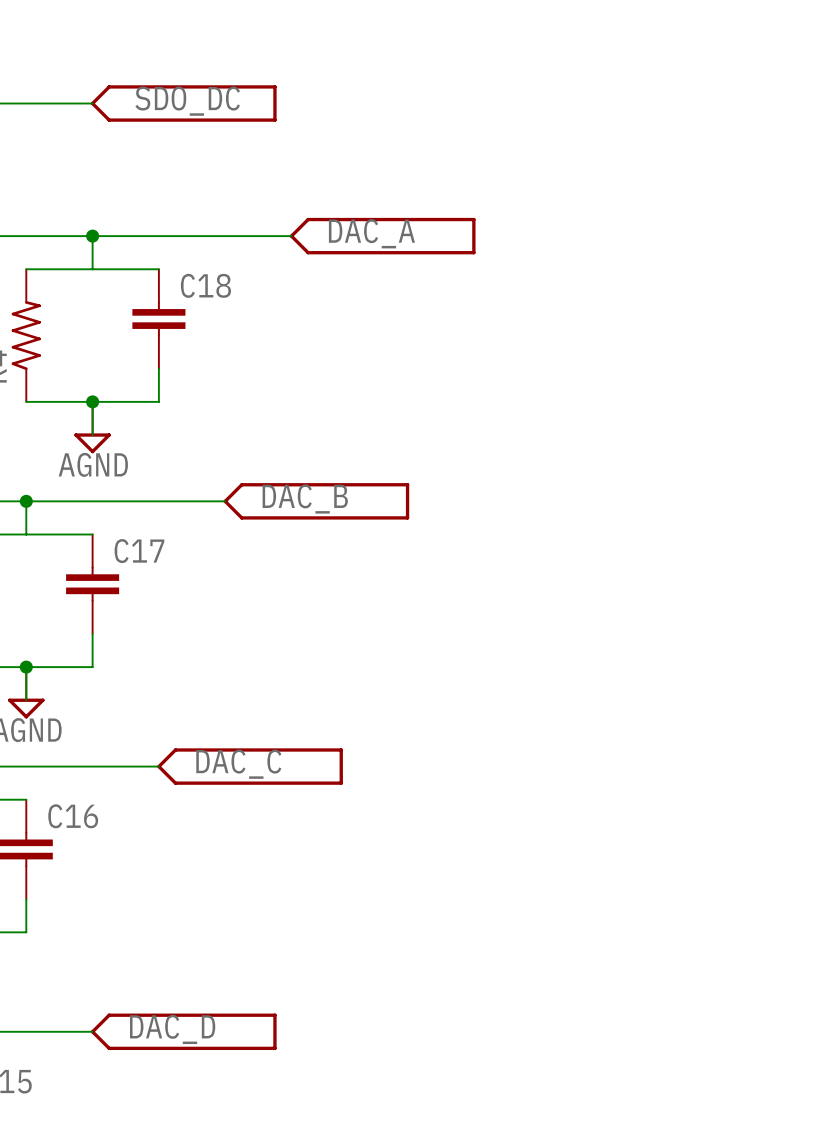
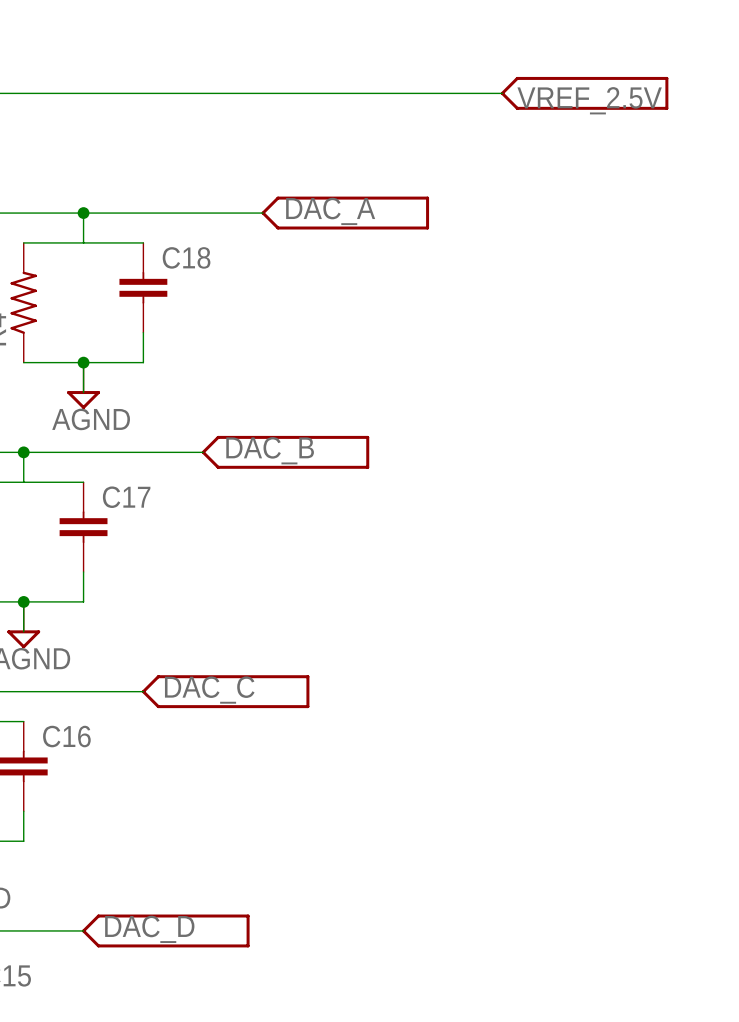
label: SDO_DC (187, 101) -> none
wire: none -> (83, 93) (502, 93)
part: (183, 103) -> none
part: none -> (584, 93)
label: none -> VREF_2.5V (589, 100)

